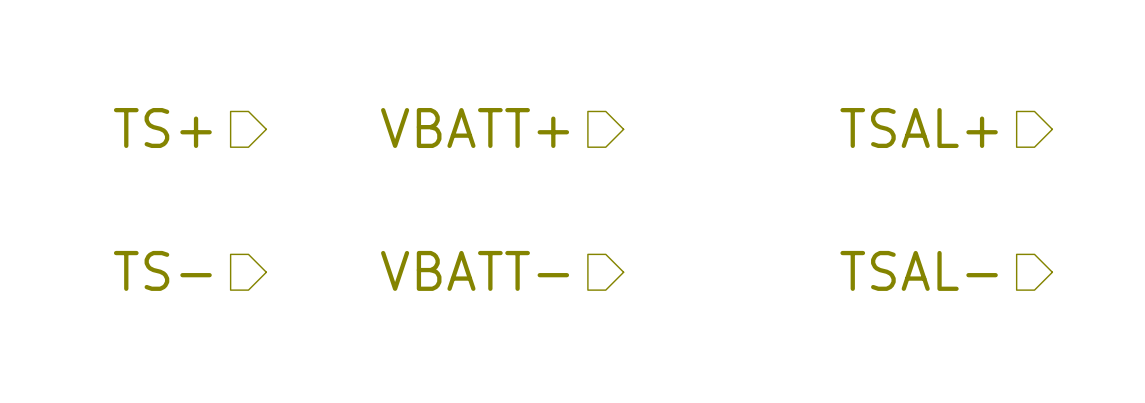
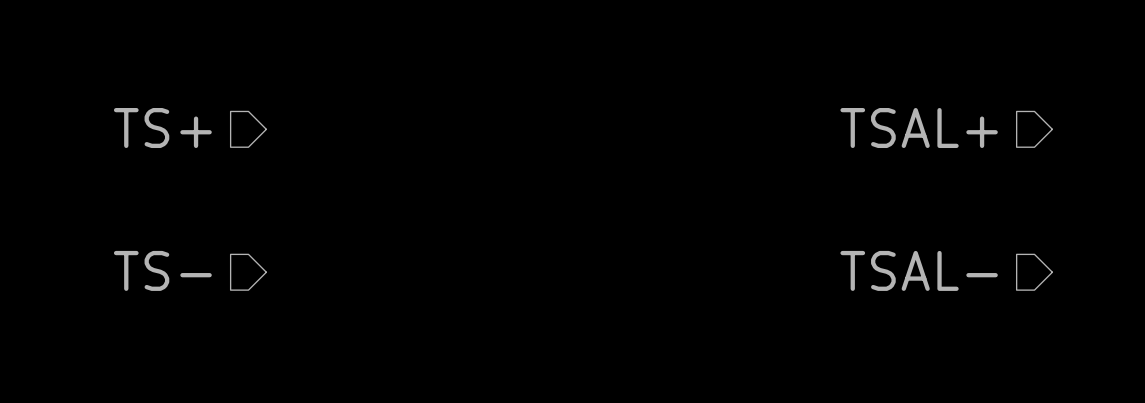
hierarchical label: VBATT+ (475, 128) -> none
hierarchical label: VBATT- (475, 270) -> none

